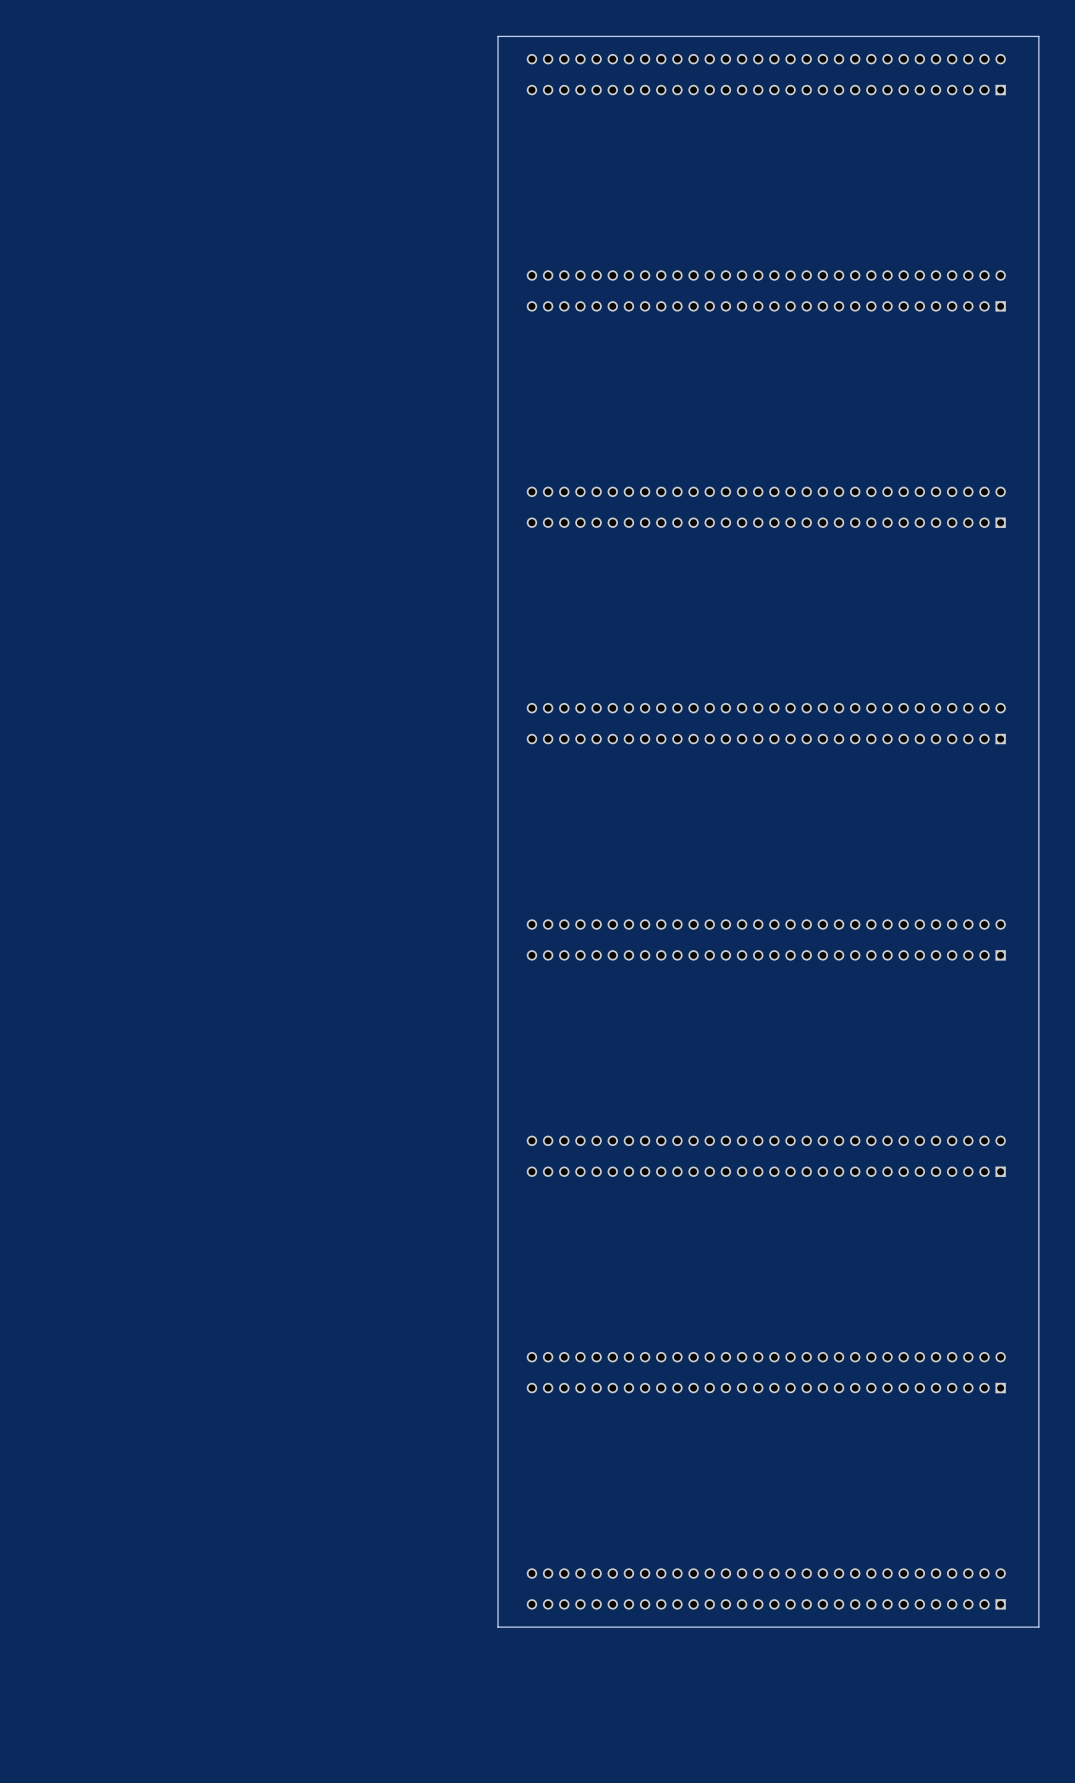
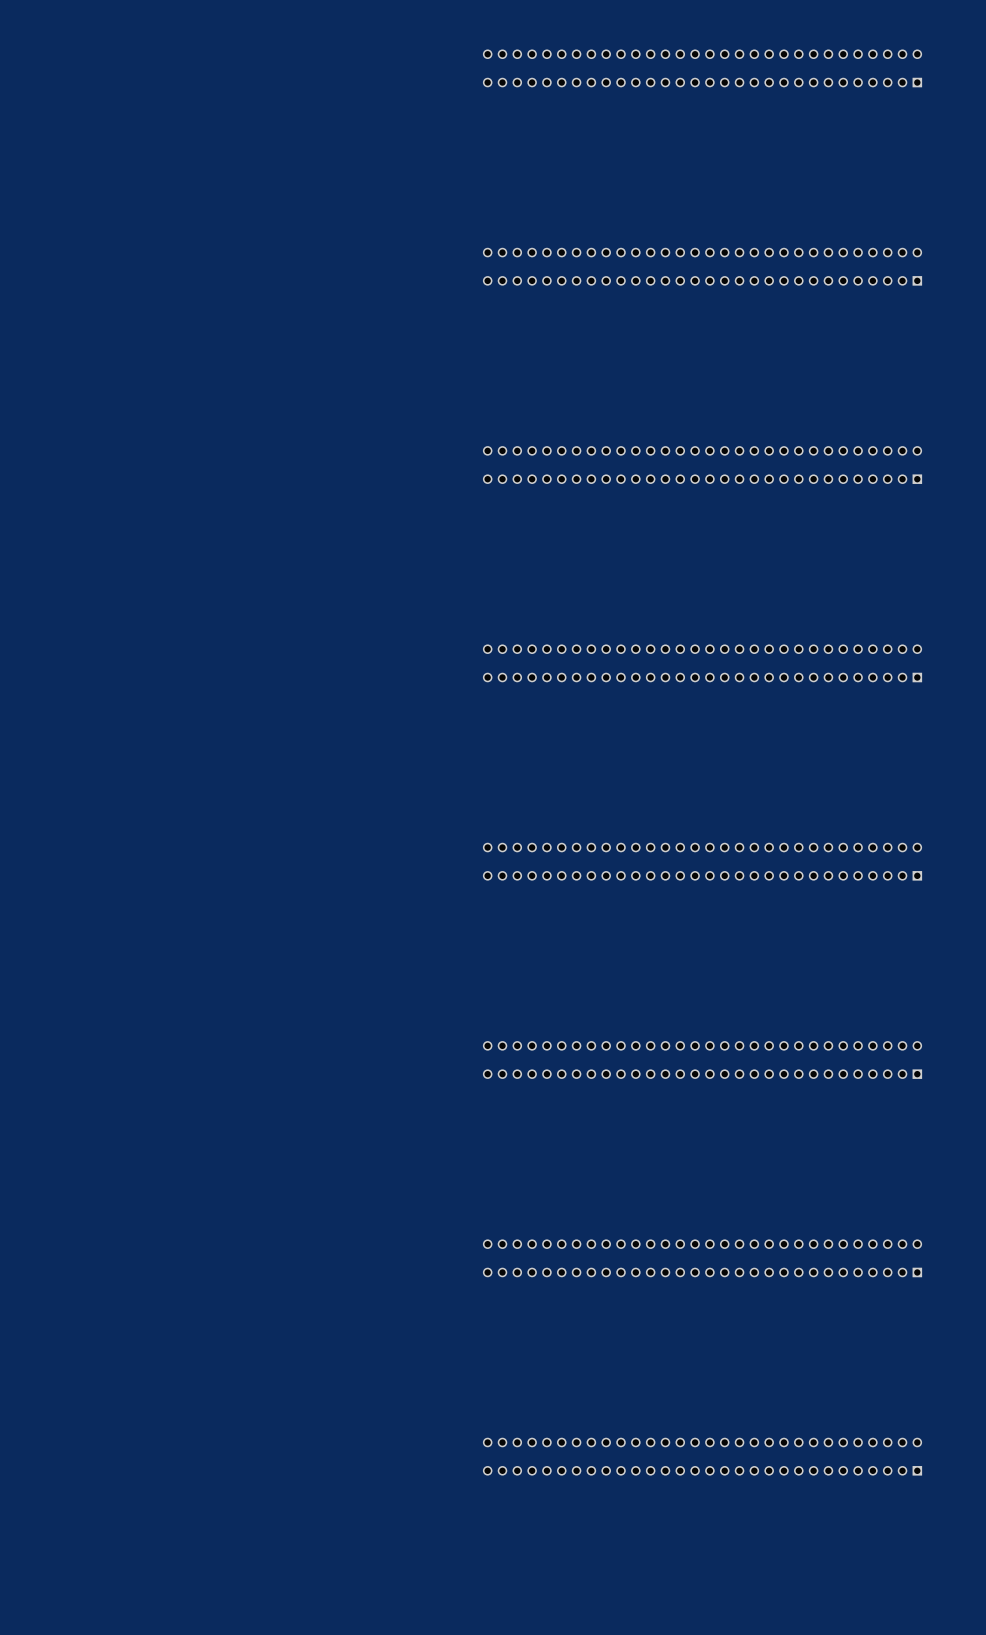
board edge: (1038, 36) (498, 36) (498, 1627) (1038, 1627) (1038, 36) -> none

